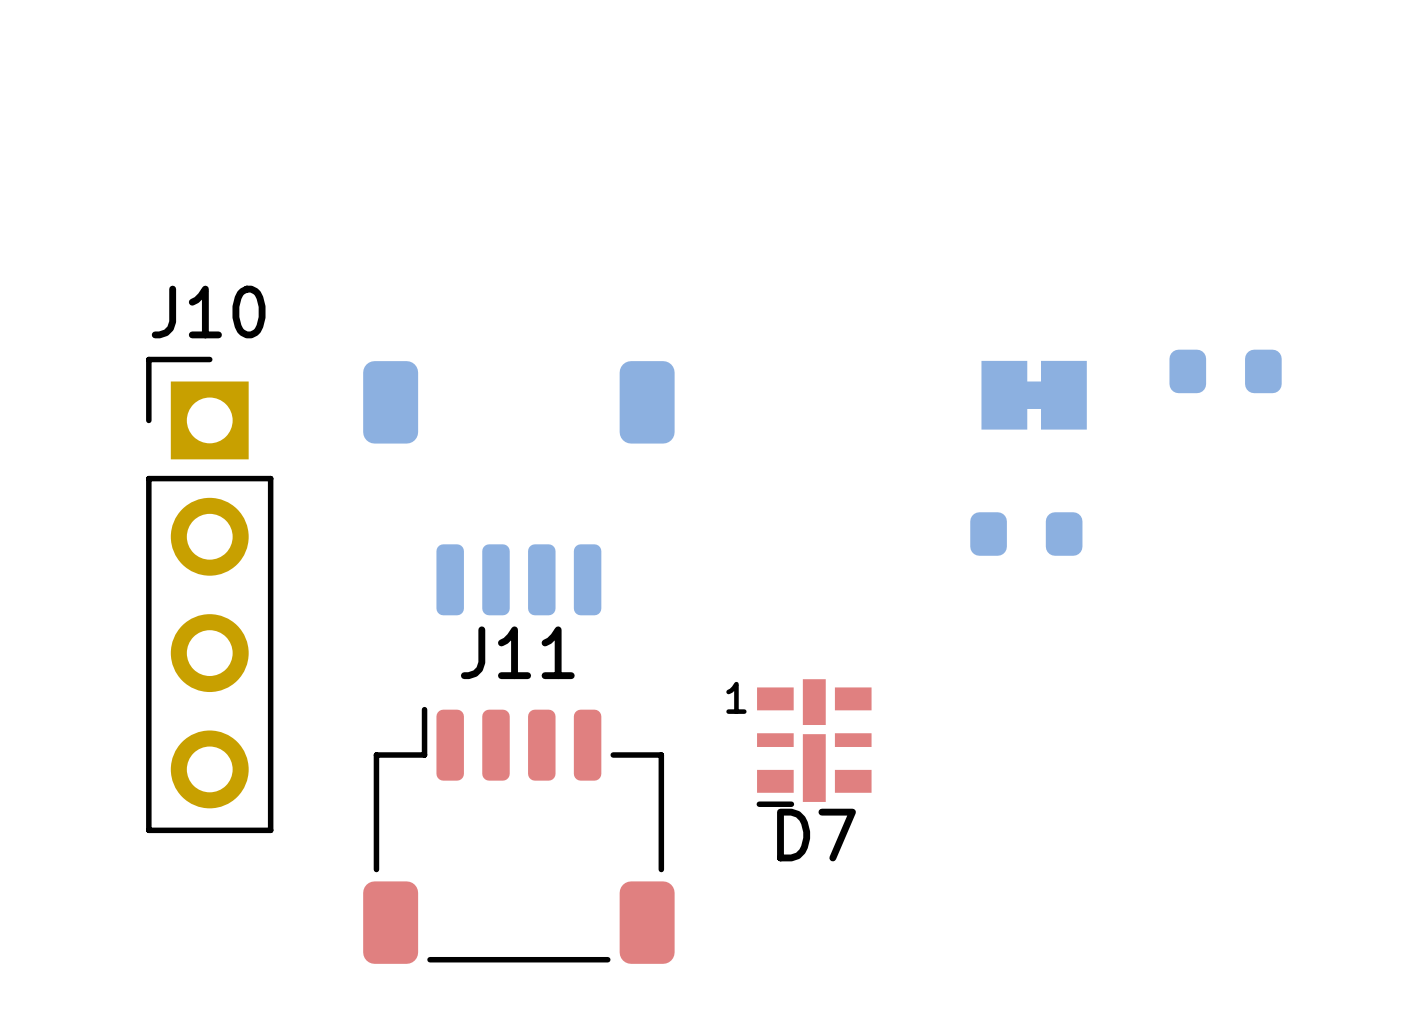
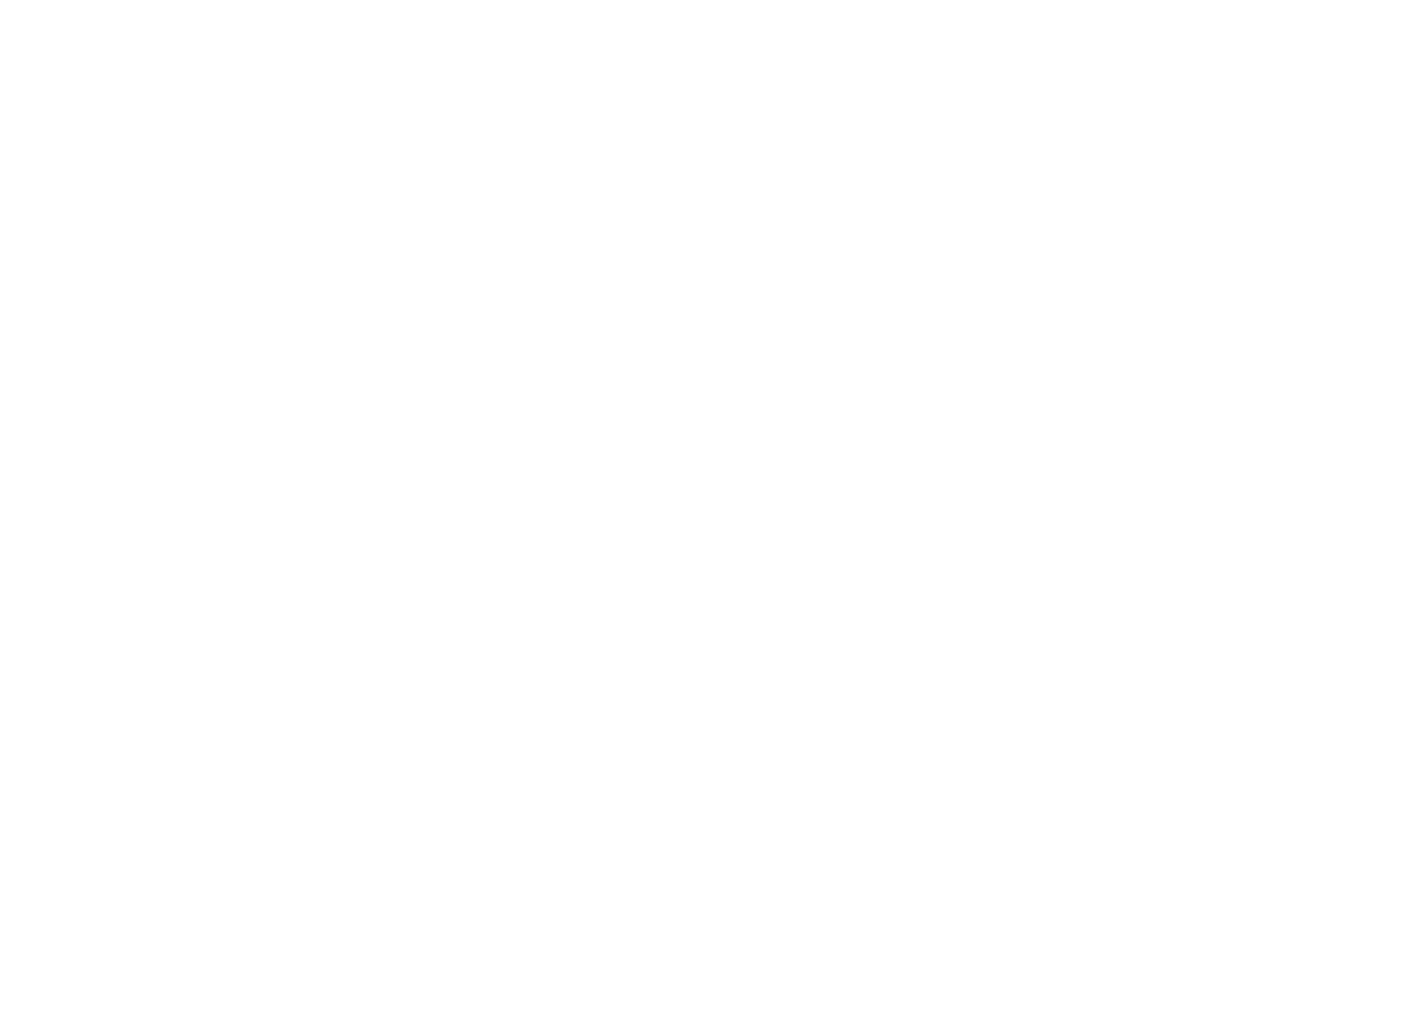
part: (1225, 371) -> none
part: (1034, 395) -> none
part: (518, 488) -> none
part: (1026, 534) -> none
J10: (209, 594) -> none
D7: (814, 743) -> none
J11: (518, 835) -> none

